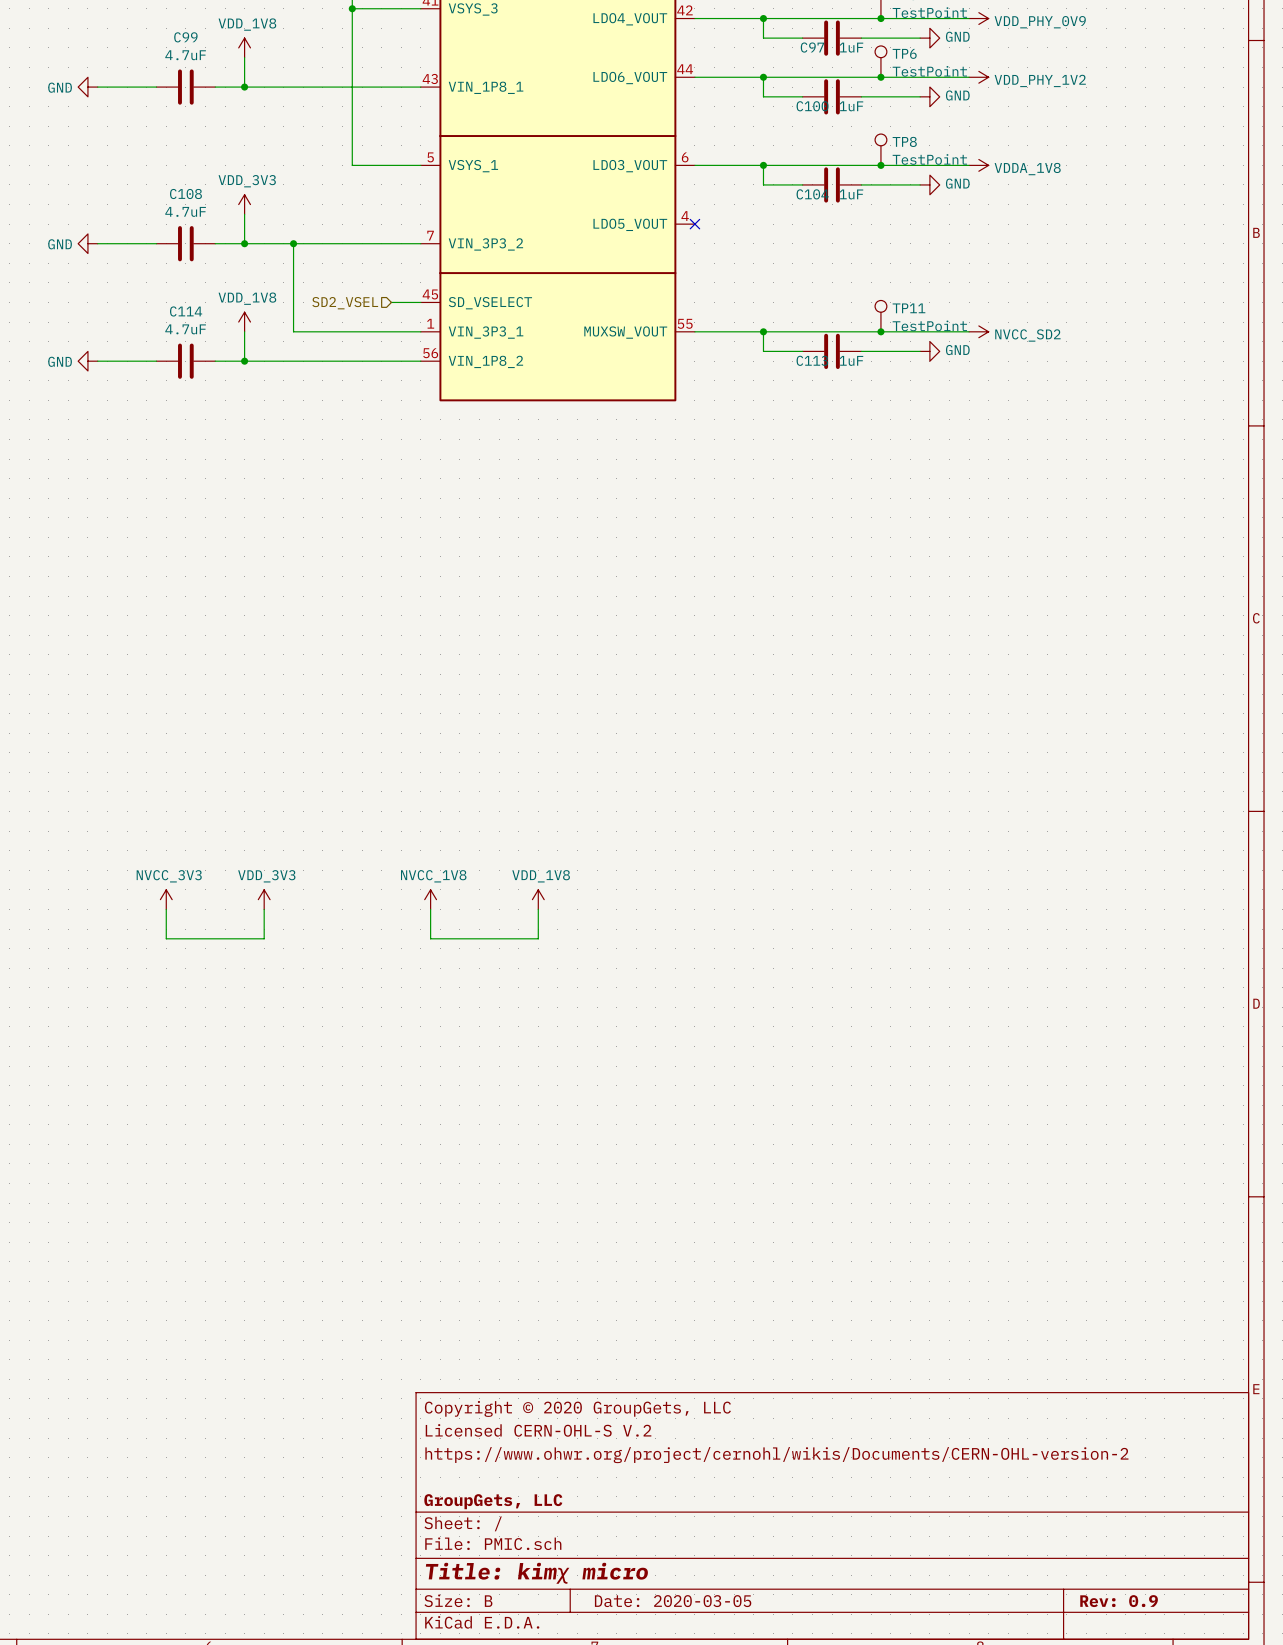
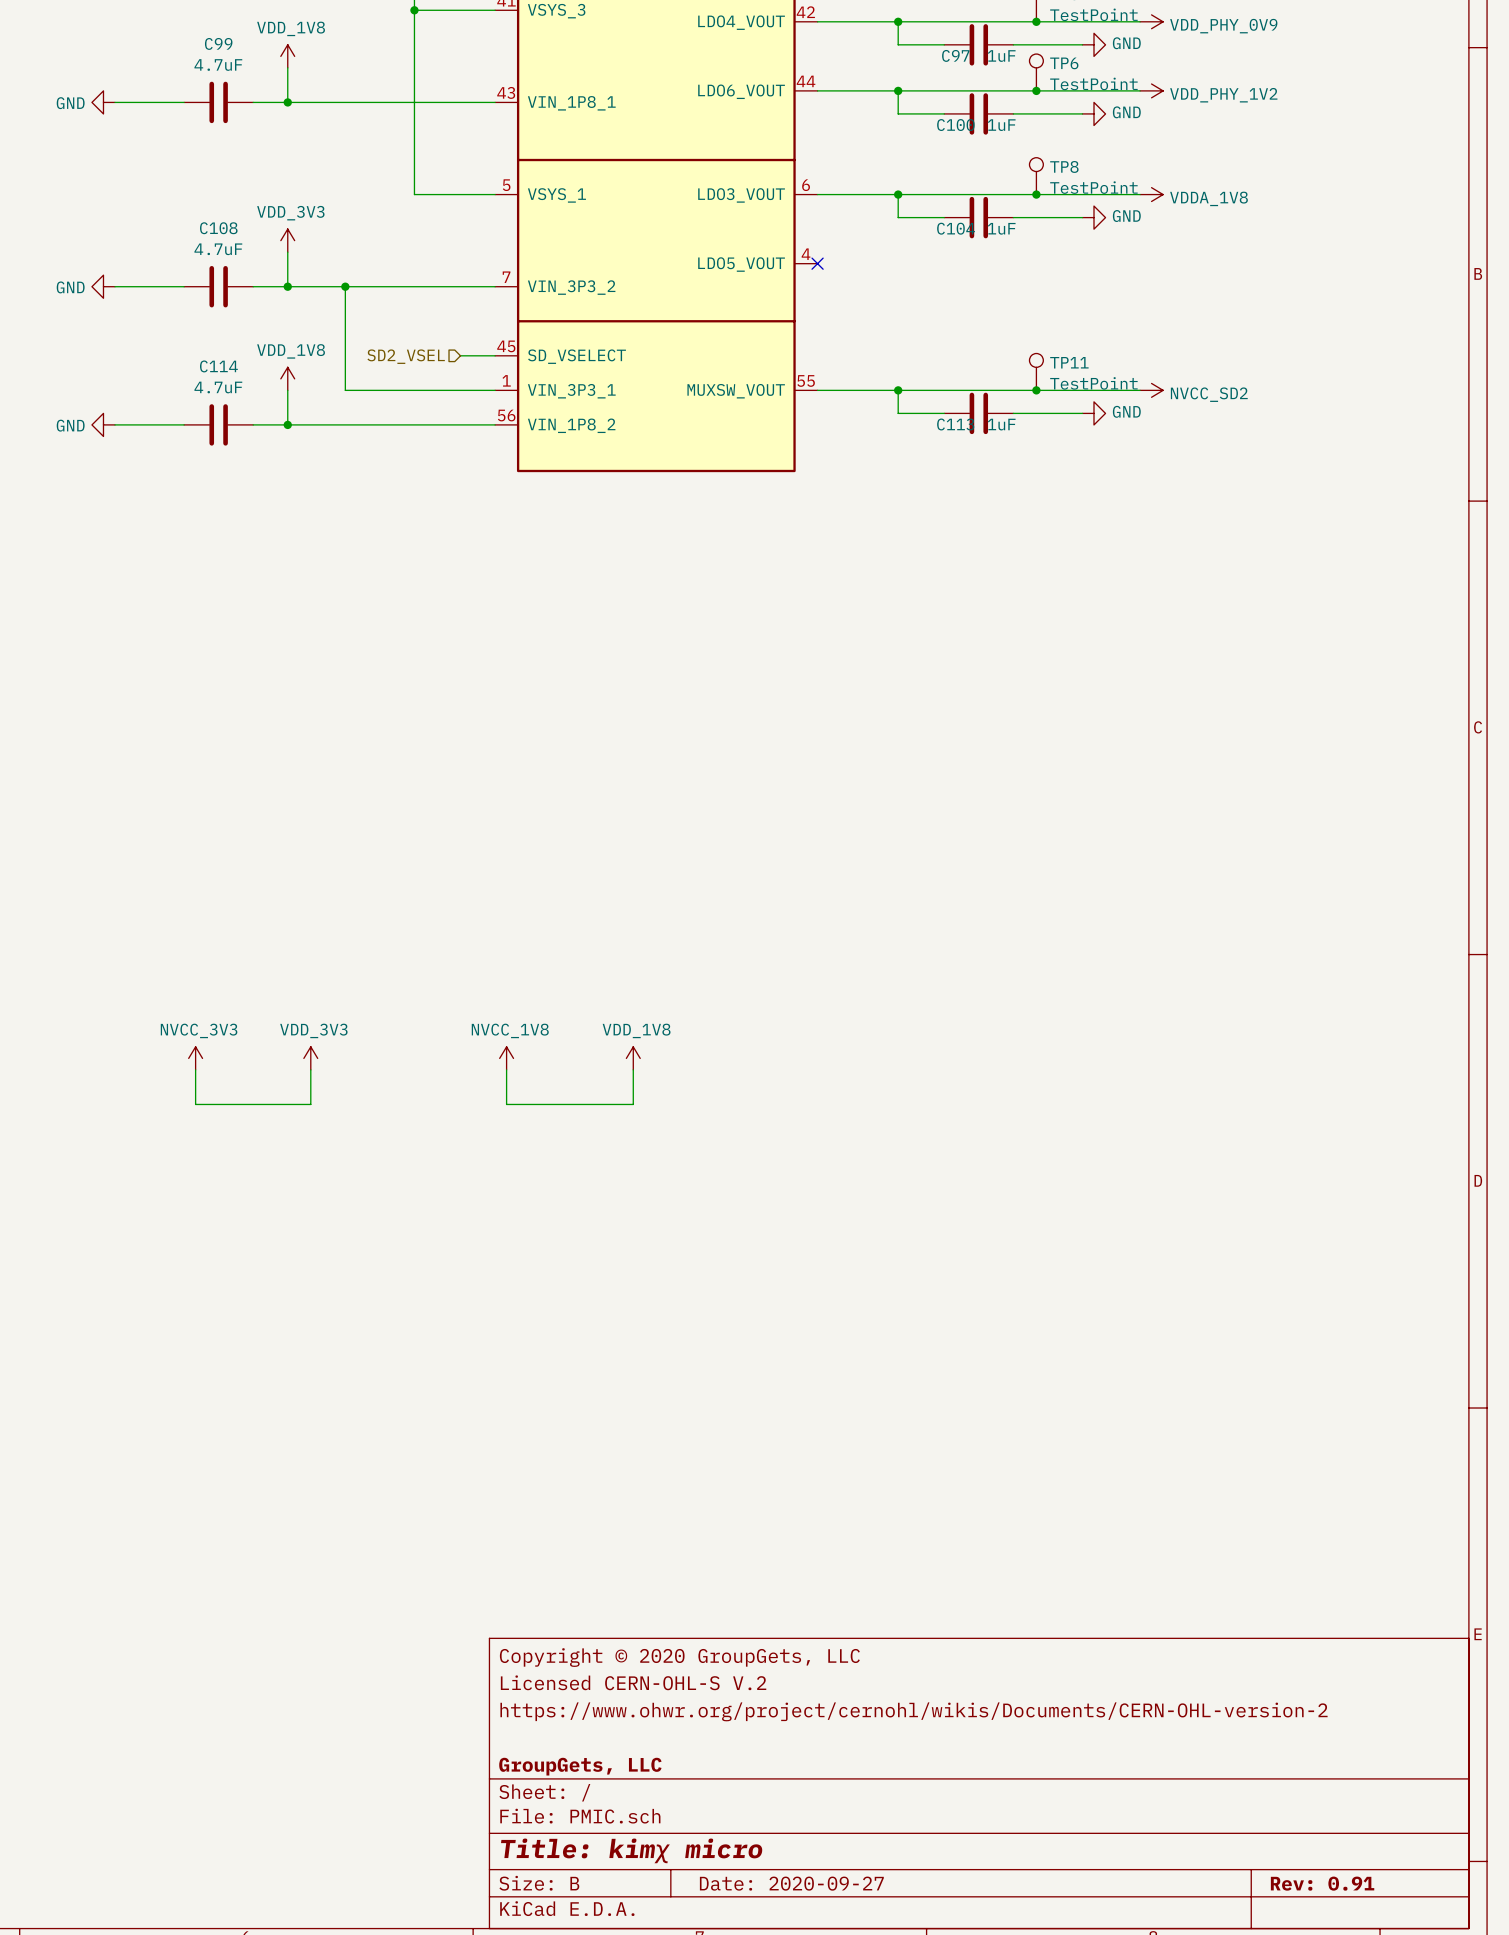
title block: Date: 2020-03-05 (673, 1601) -> Date: 2020-09-27 (791, 1883)
title block: Rev: 0.9 (1119, 1601) -> Rev: 0.91 (1322, 1883)

